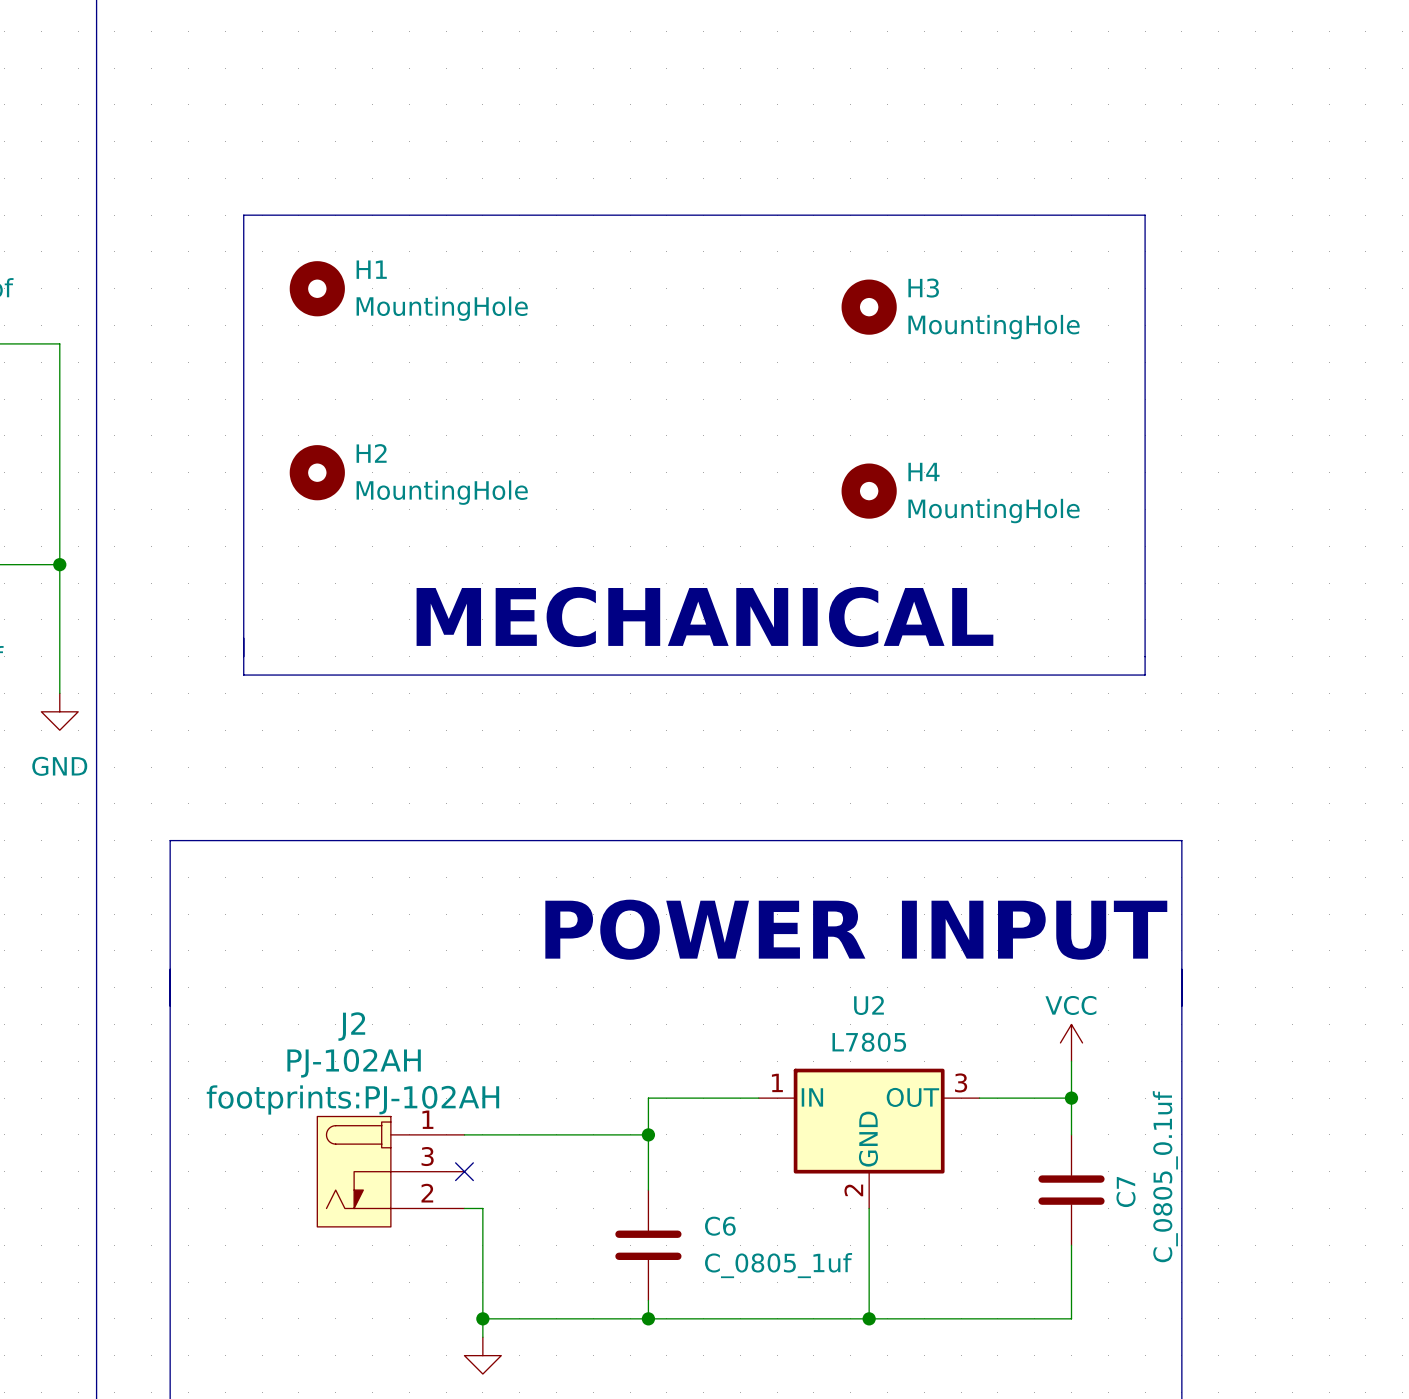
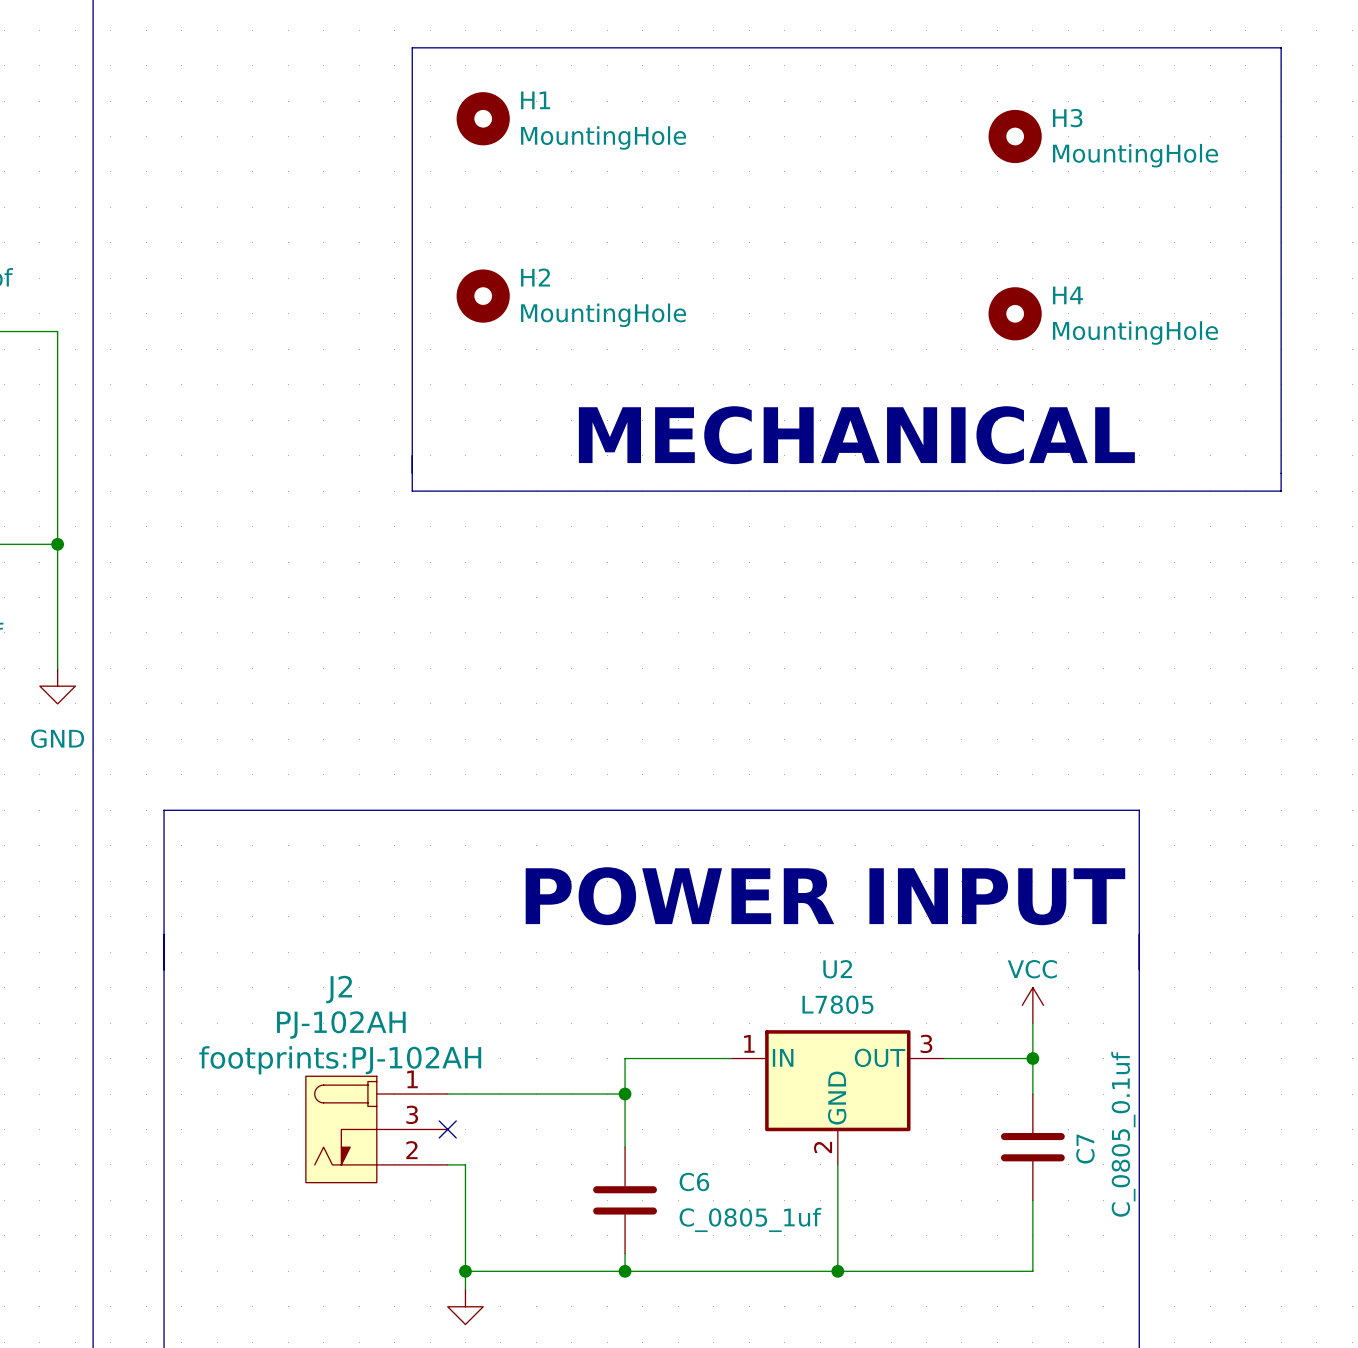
line: (243, 215) (1145, 215) (1145, 675) (243, 675) (243, 215) -> (412, 47) (1281, 47) (1281, 491) (412, 491) (412, 47)
H1 position: (317, 288) -> (483, 118)
H3 position: (869, 307) -> (1015, 136)
H2 position: (317, 472) -> (483, 296)
H4 position: (869, 491) -> (1015, 313)
text position: MECHANICAL (704, 617) -> MECHANICAL (856, 435)

